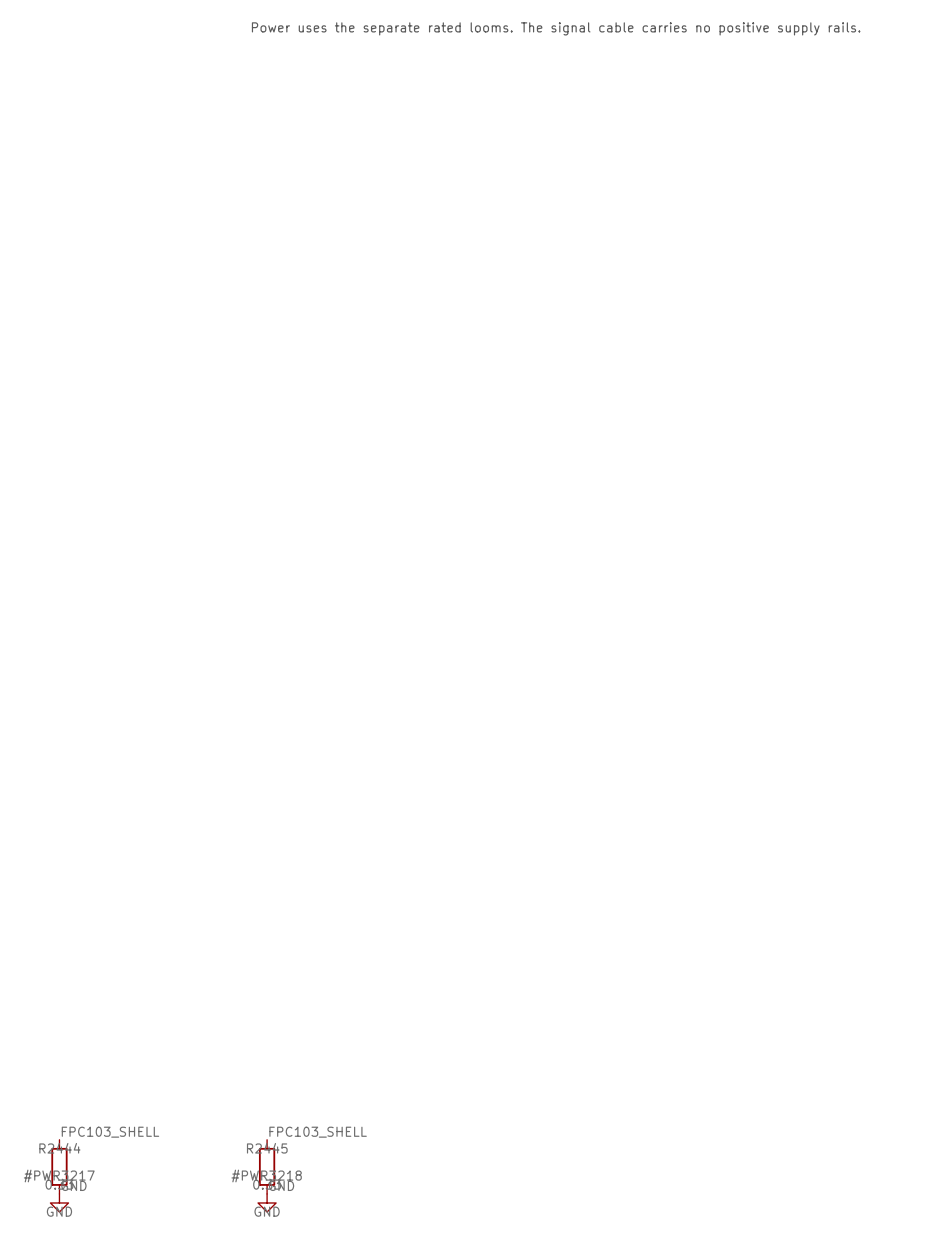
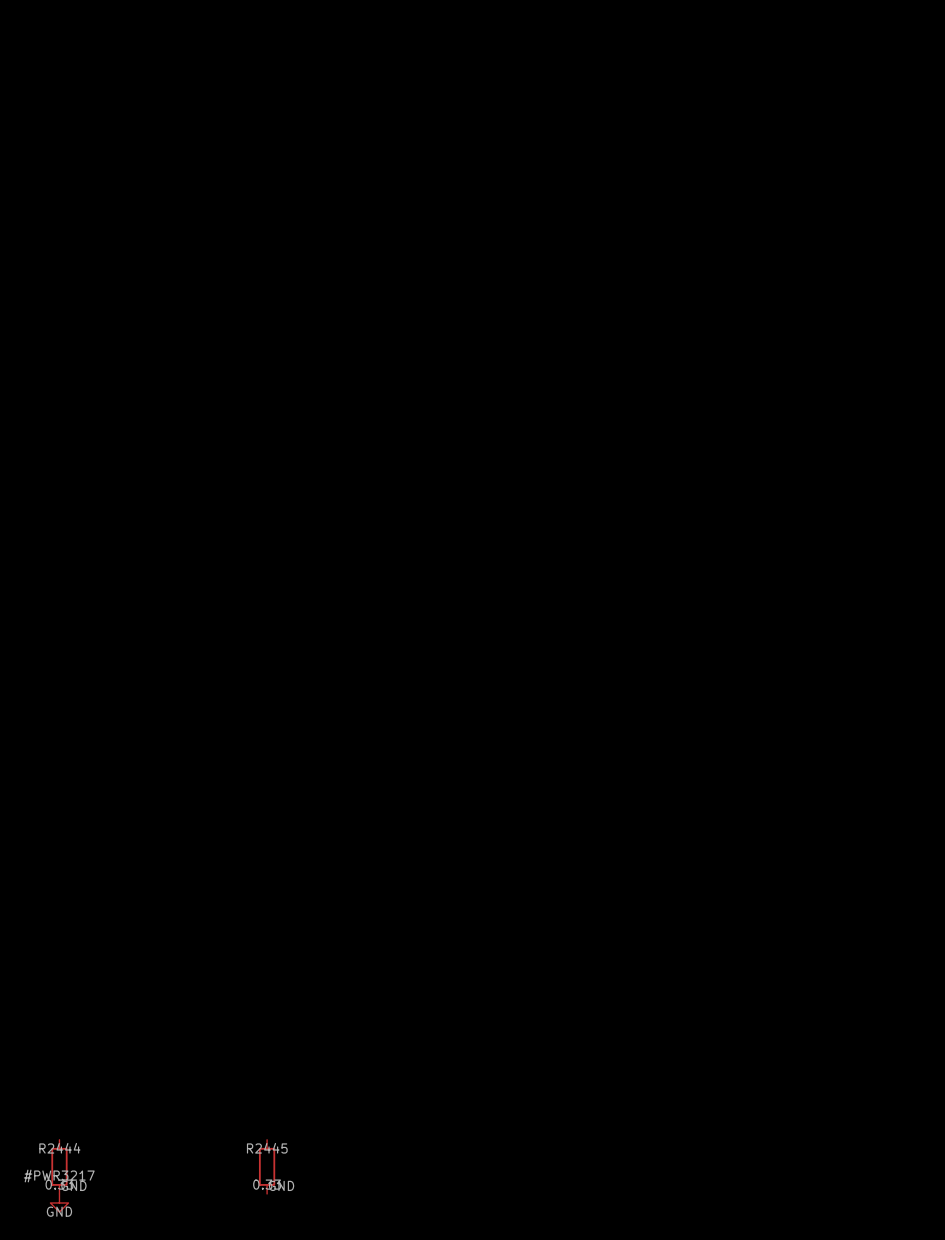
text: Power uses the separate rated looms. The signal cable carries no positive supply rails. (556, 28) -> none
label: FPC103_SHELL (110, 1132) -> none
label: FPC103_SHELL (318, 1132) -> none
#PWR3218: GND (267, 1202) -> none

